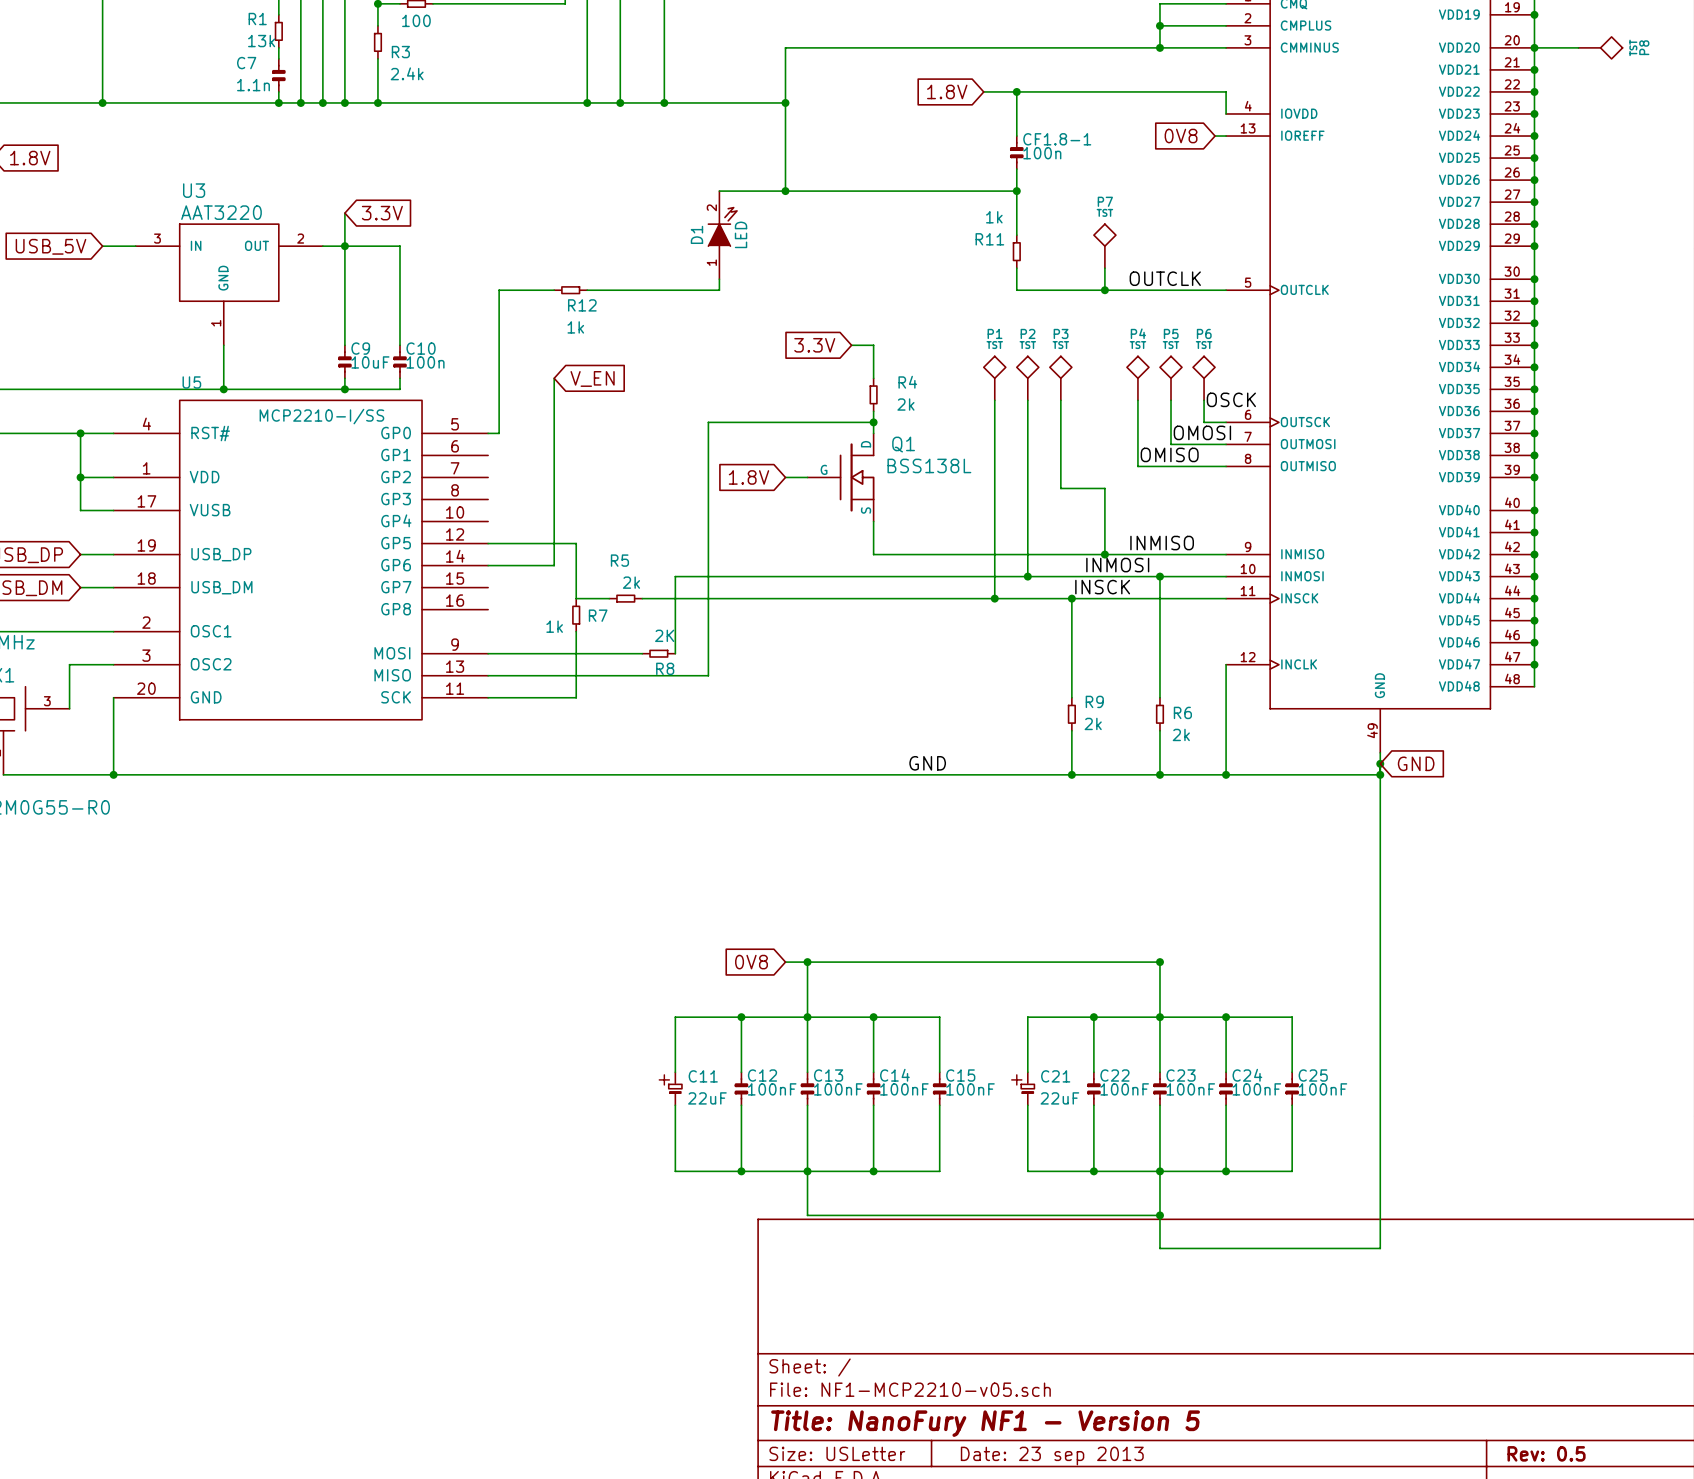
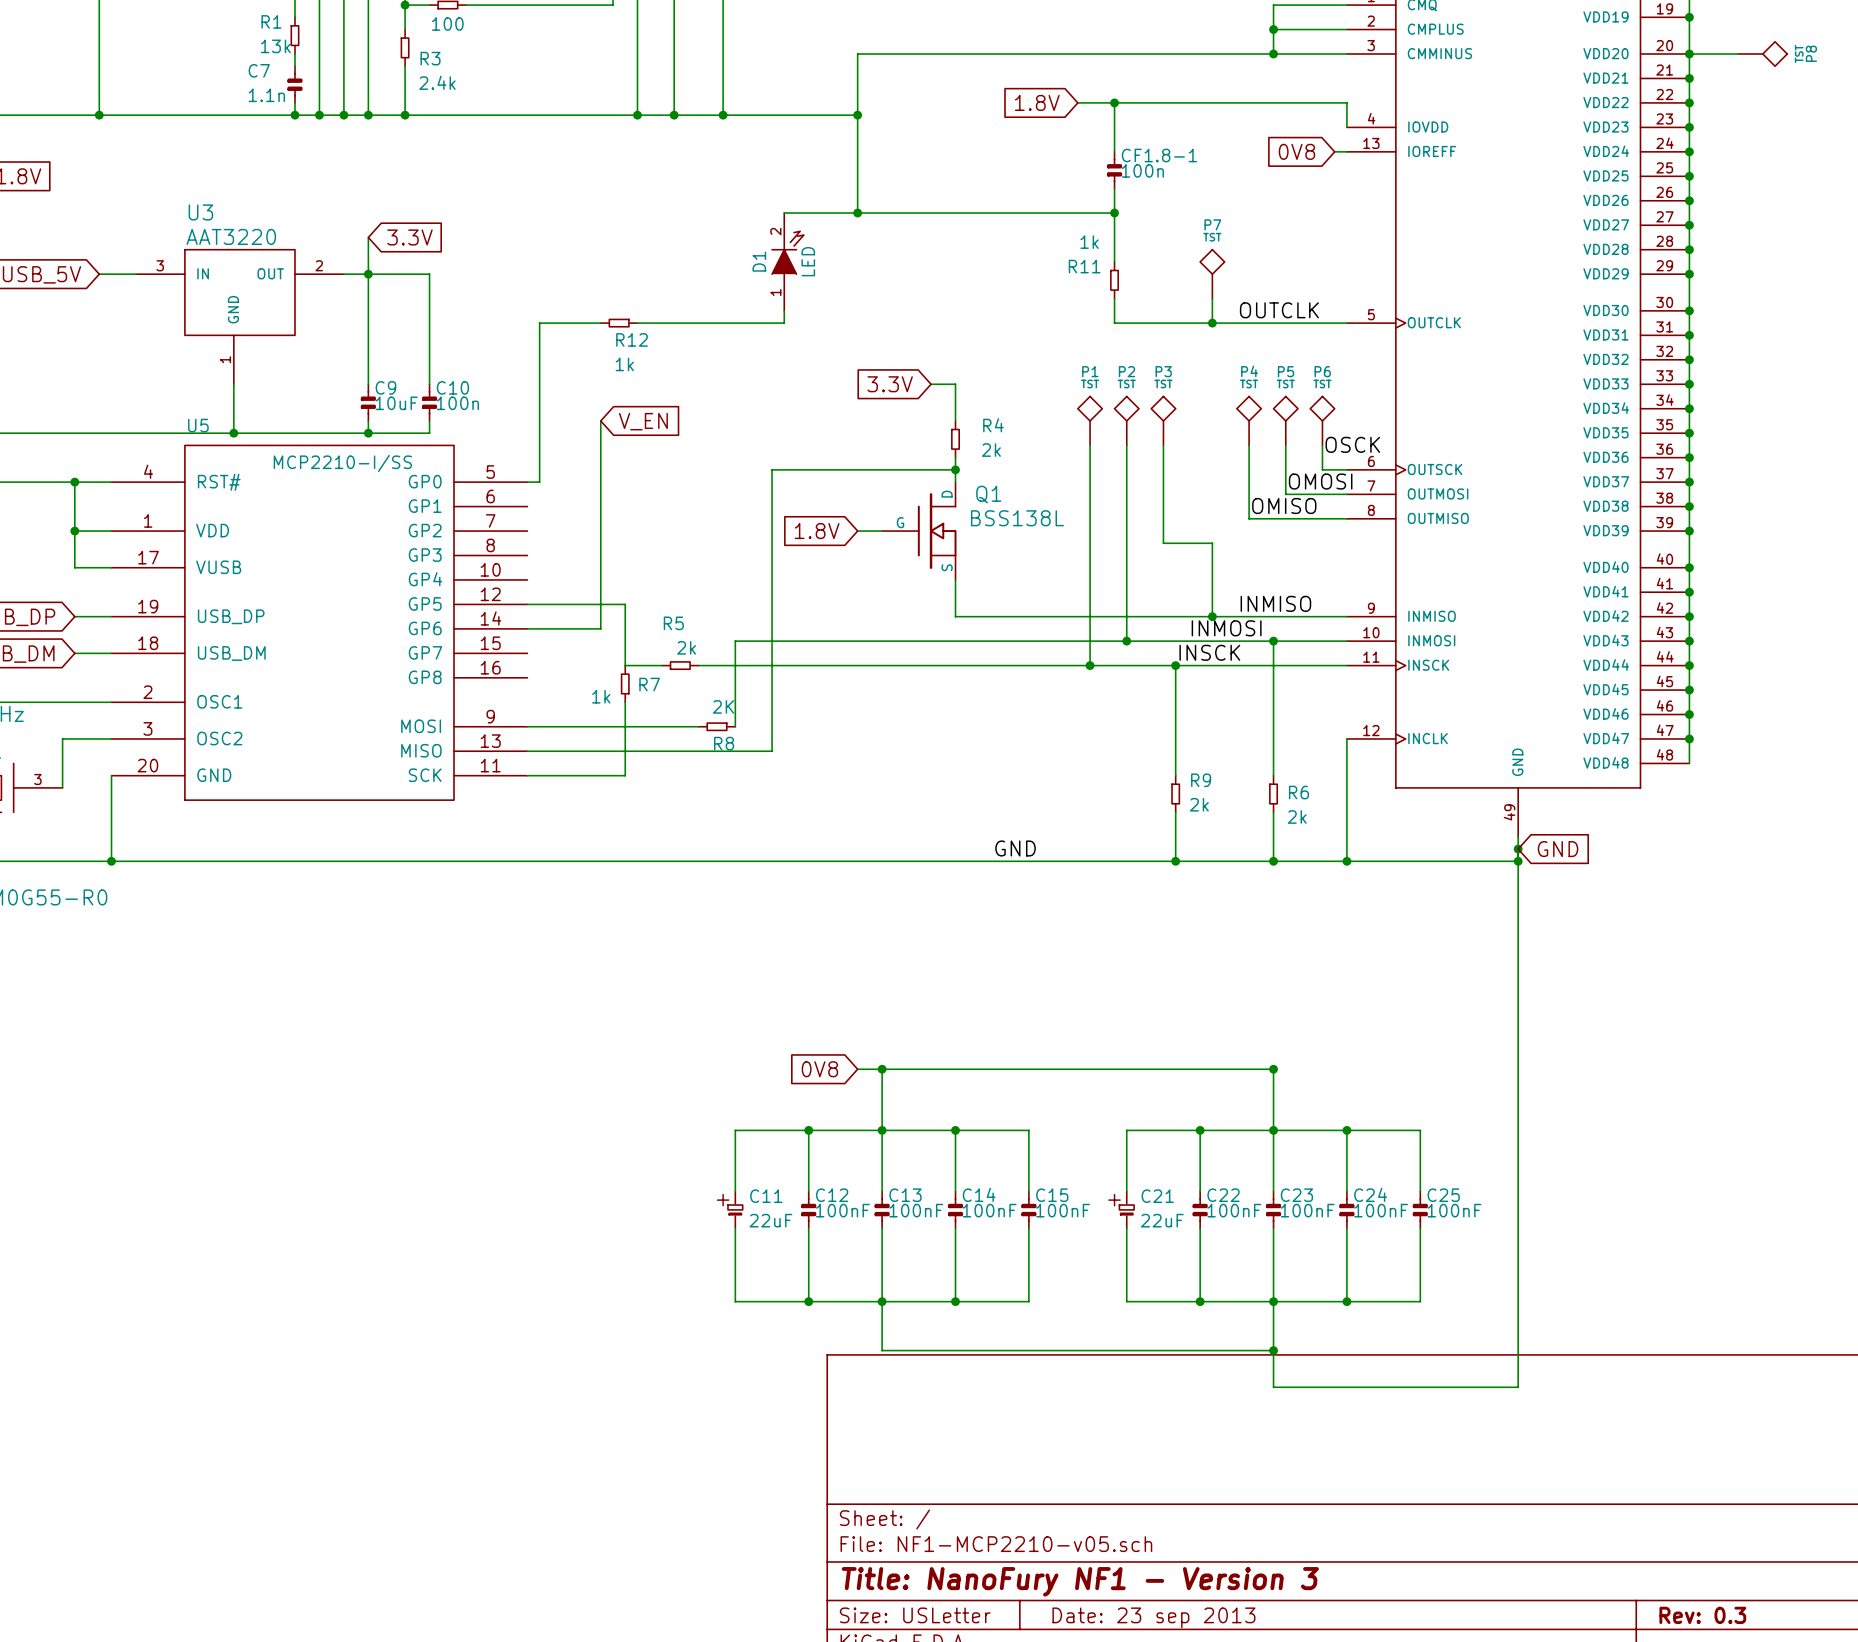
title block: Title: NanoFury NF1 - Version 5 (985, 1423) -> Title: NanoFury NF1 - Version 3 (1080, 1581)
title block: Rev: 0.5 (1546, 1453) -> Rev: 0.3 (1702, 1615)

